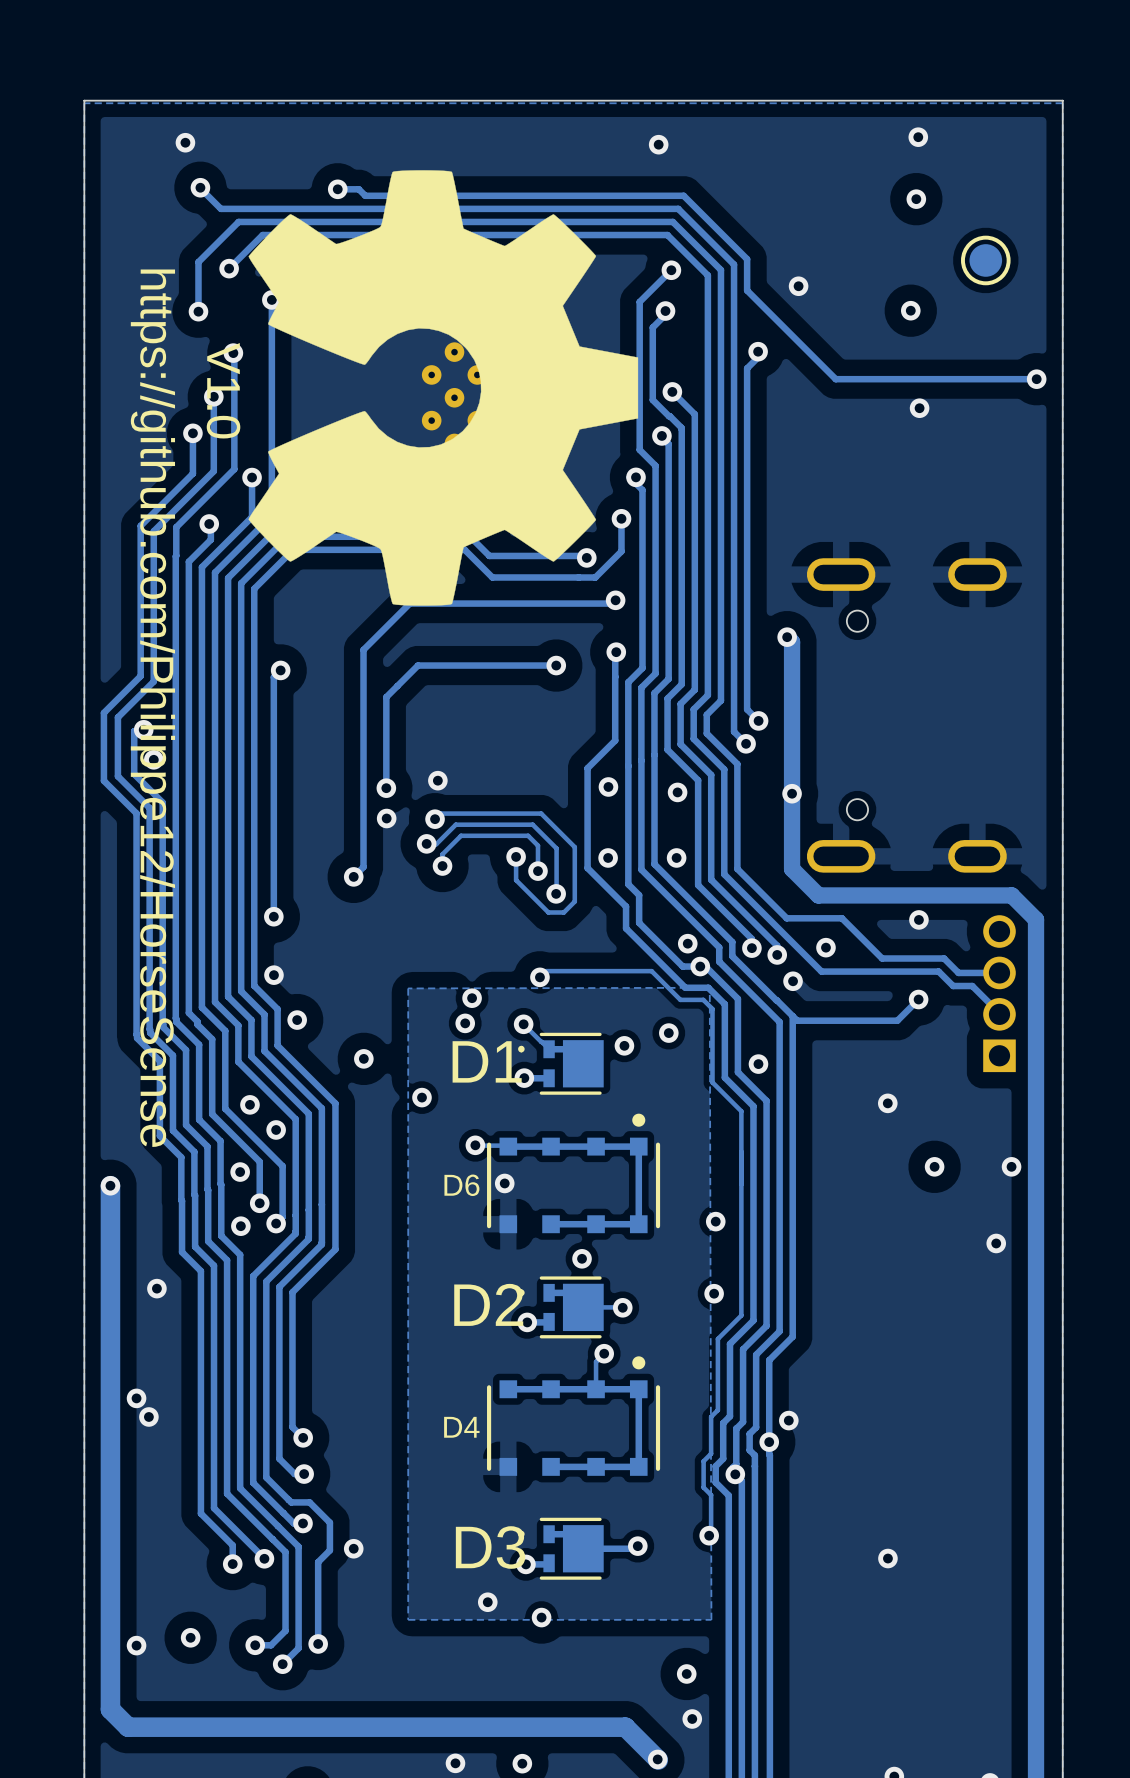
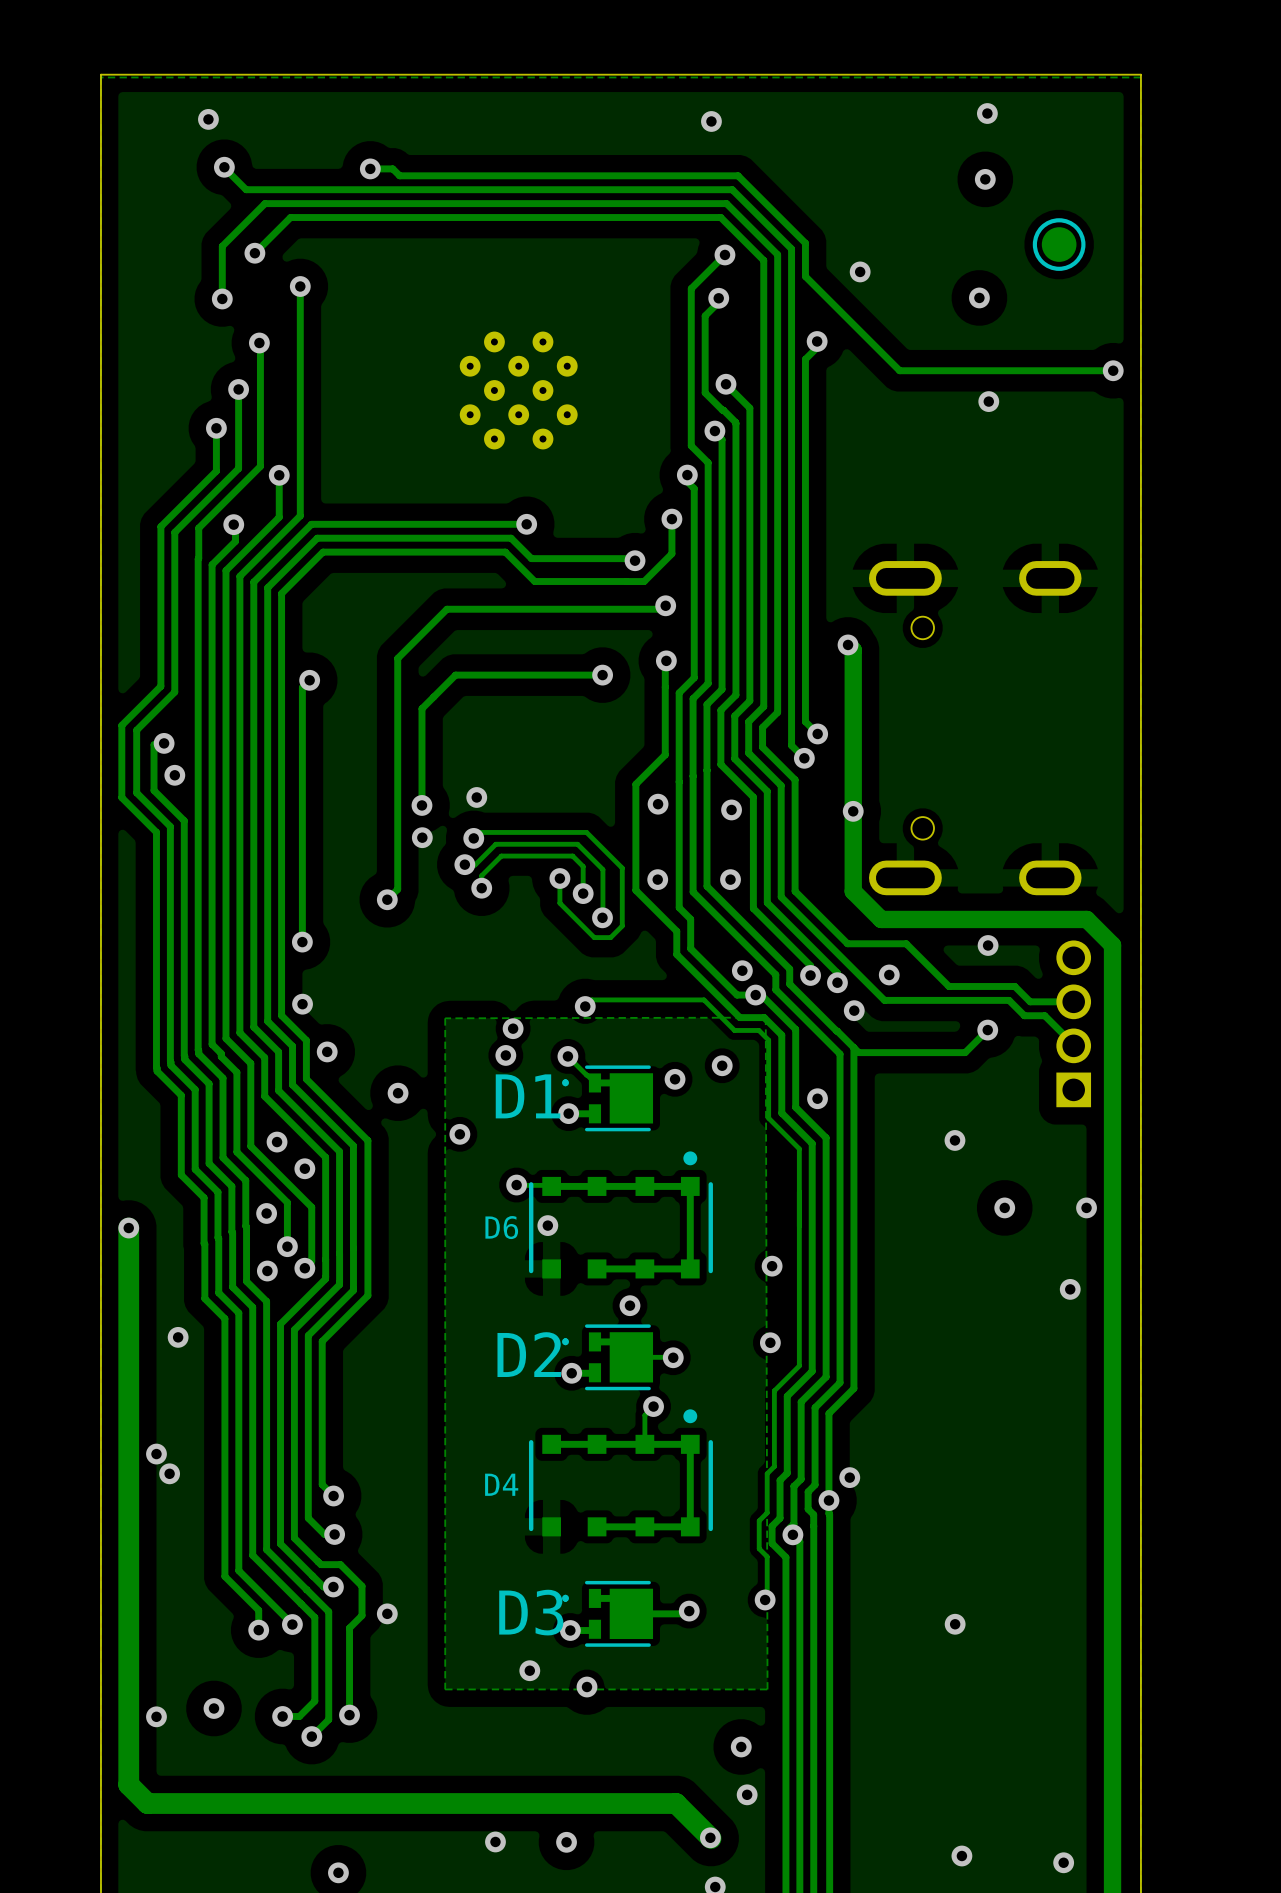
drawing: [248, 170, 639, 606] -> none

